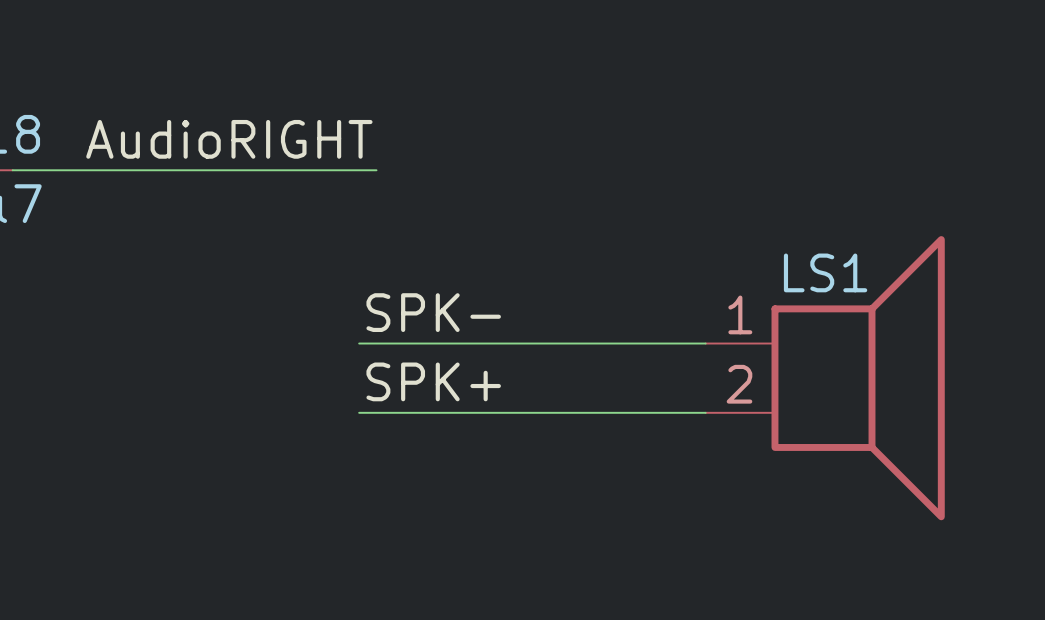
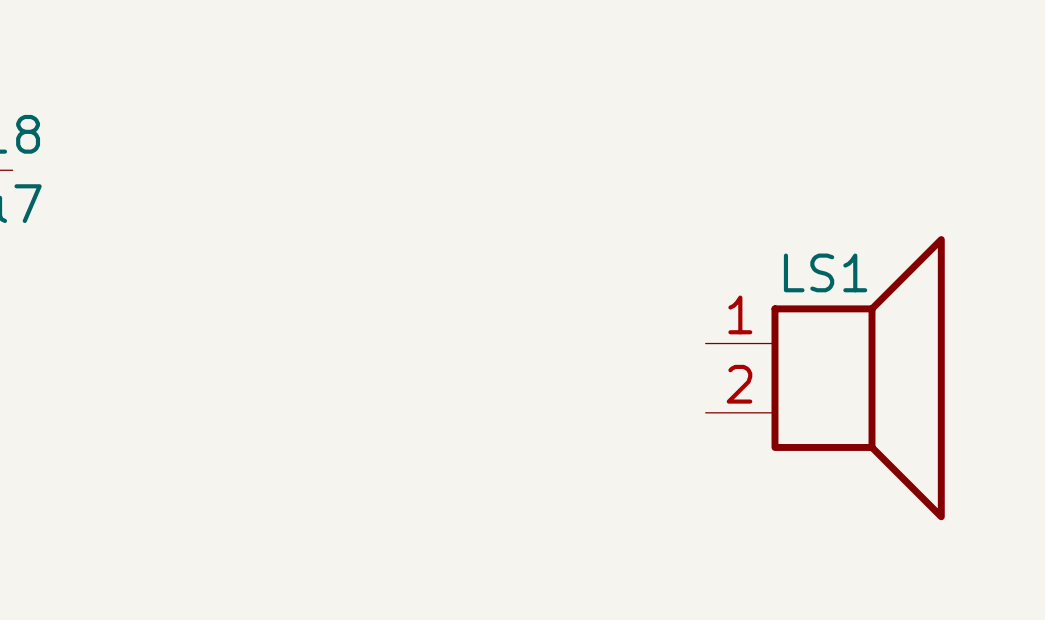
label: AudioRIGHT (229, 139) -> none
wire: (12, 170) (376, 170) -> none
label: SPK- (433, 312) -> none
wire: (359, 343) (705, 343) -> none
label: SPK+ (433, 381) -> none
wire: (359, 412) (705, 412) -> none

